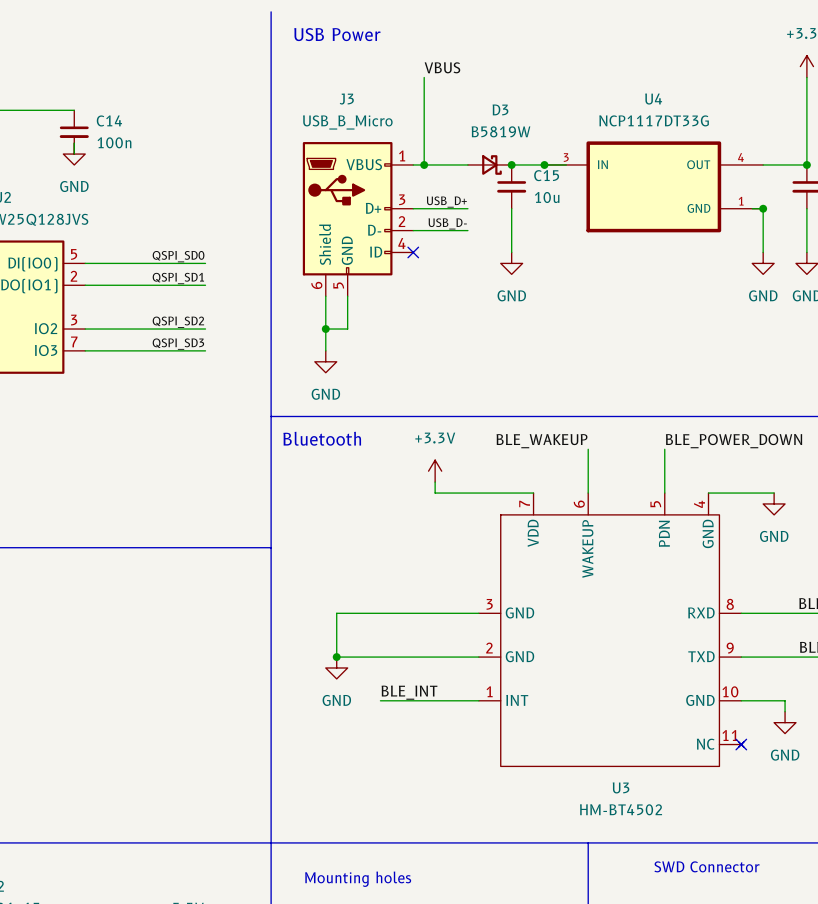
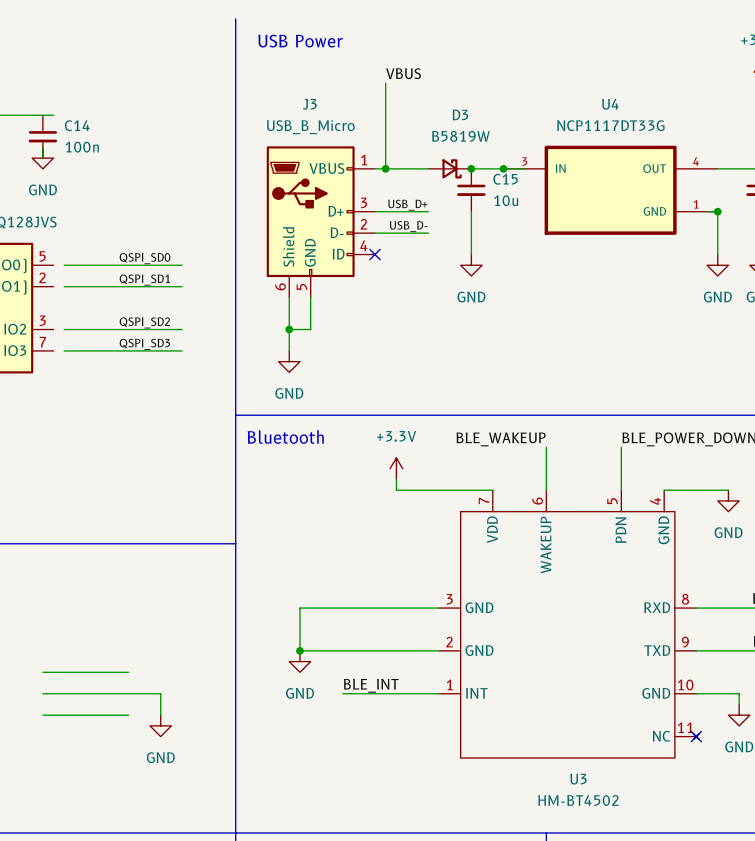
wire: none -> (42, 115) (53, 115)
wire: (85, 263) (96, 263) -> (171, 265) (182, 265)
wire: (85, 285) (96, 285) -> (171, 286) (182, 286)
wire: (85, 329) (96, 329) -> (171, 329) (182, 329)
wire: (85, 350) (96, 350) -> (171, 350) (182, 350)
wire: none -> (42, 672) (128, 672)
wire: none -> (42, 693) (160, 693) (160, 715)
wire: none -> (42, 715) (128, 715)
power symbol: none -> GND (160, 725)

